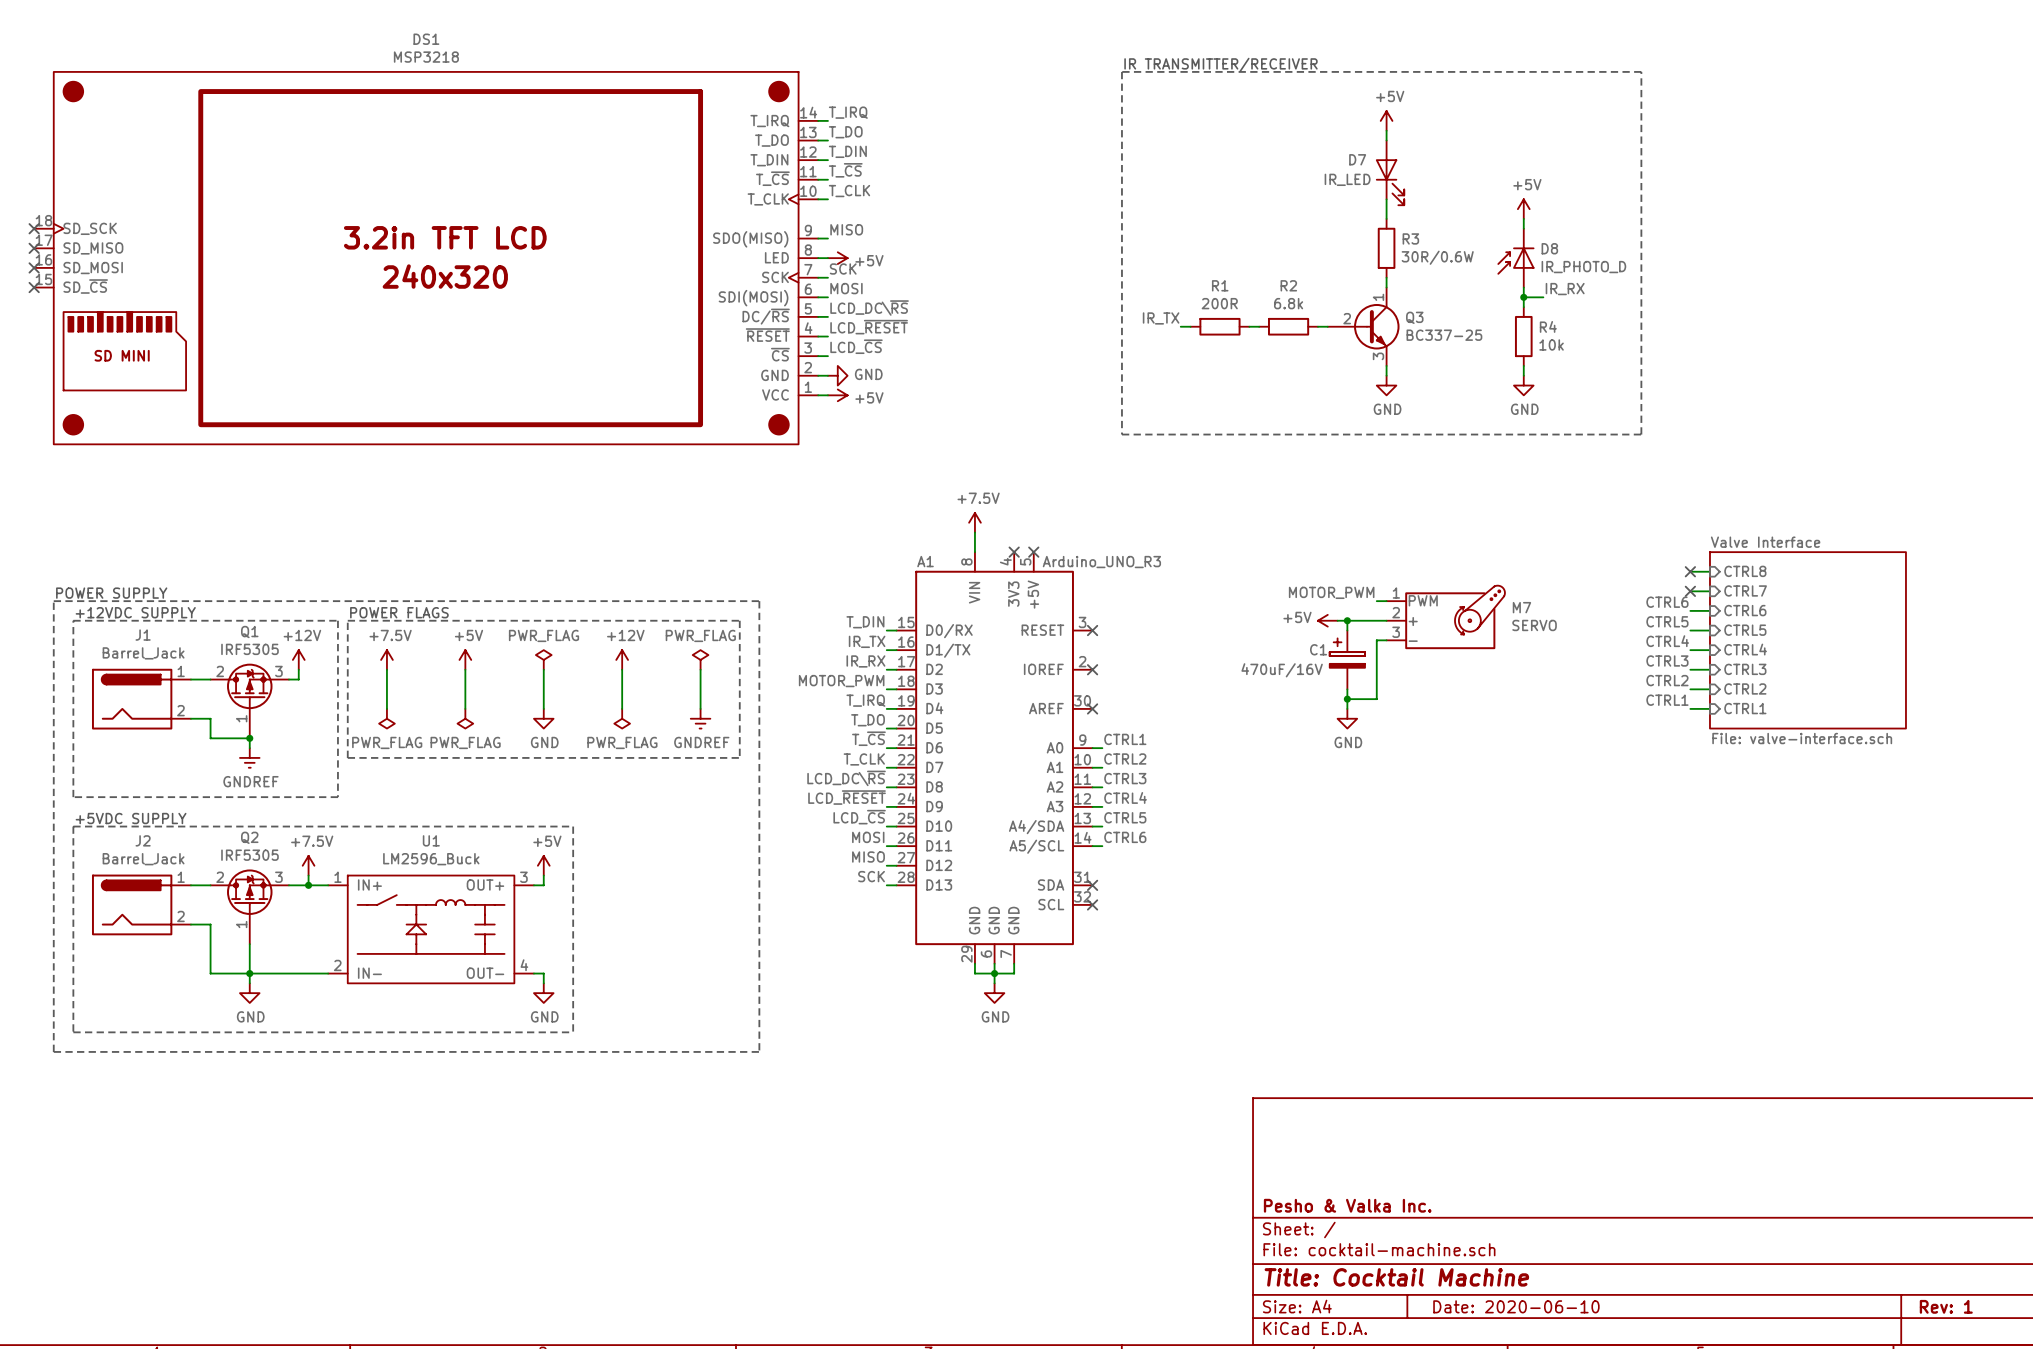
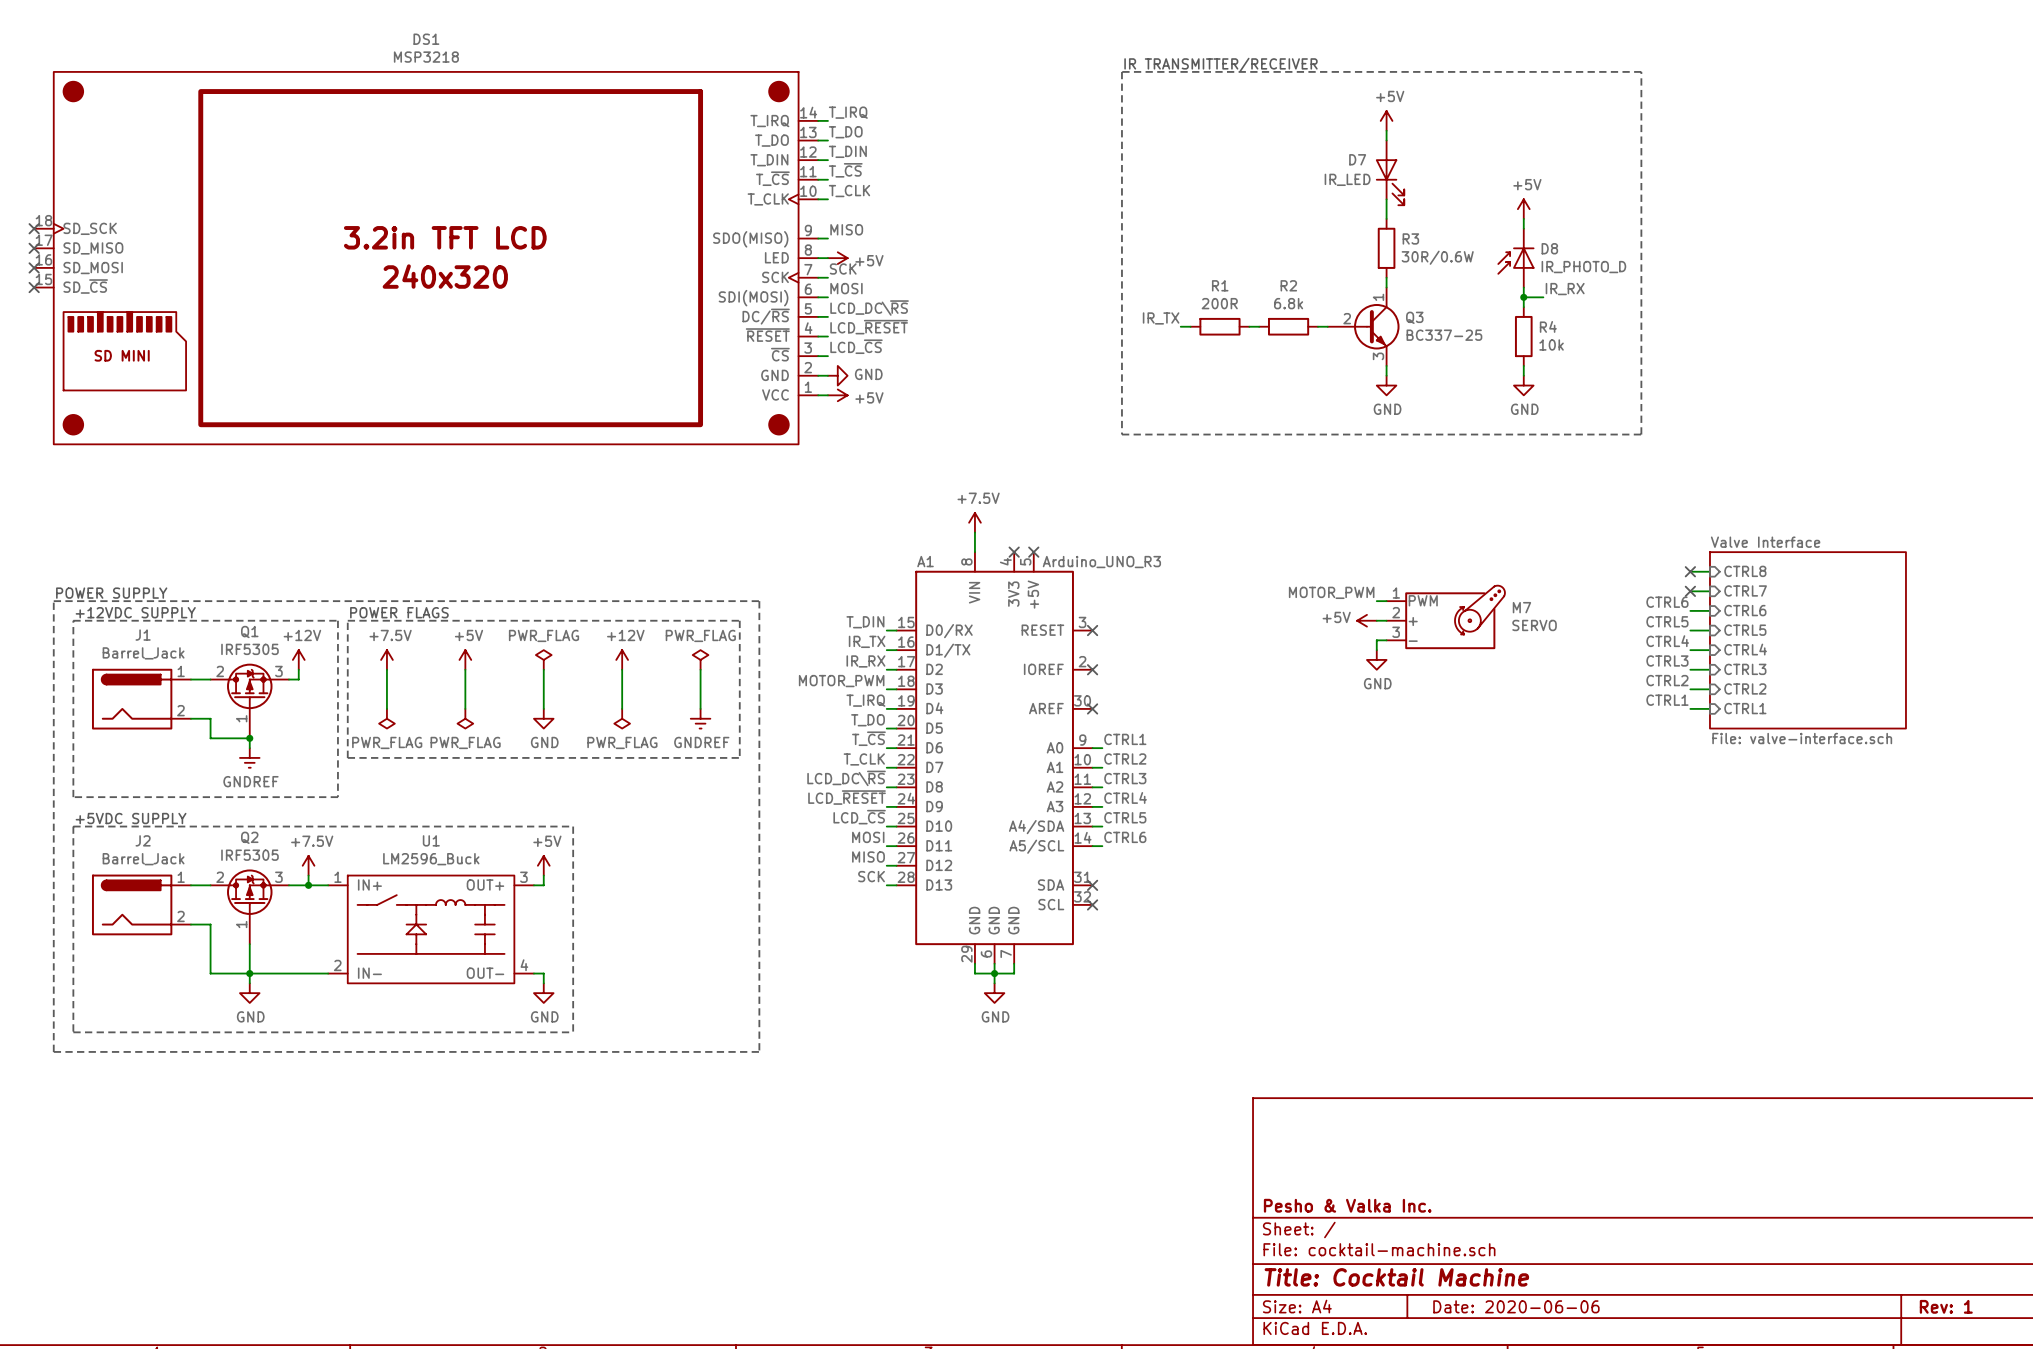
power symbol position: +5V (1327, 620) -> +5V (1366, 620)
wire: (1347, 620) (1347, 630) -> none
junction: (1347, 620) -> none
wire: (1376, 650) (1376, 699) (1347, 699) -> none
C1: 470uF/16V (1347, 659) -> none
wire: (1347, 689) (1347, 708) -> none
junction: (1347, 699) -> none
power symbol position: GND (1347, 718) -> GND (1376, 659)
title block: Date: 2020-06-10 (1516, 1306) -> Date: 2020-06-06 (1516, 1306)

